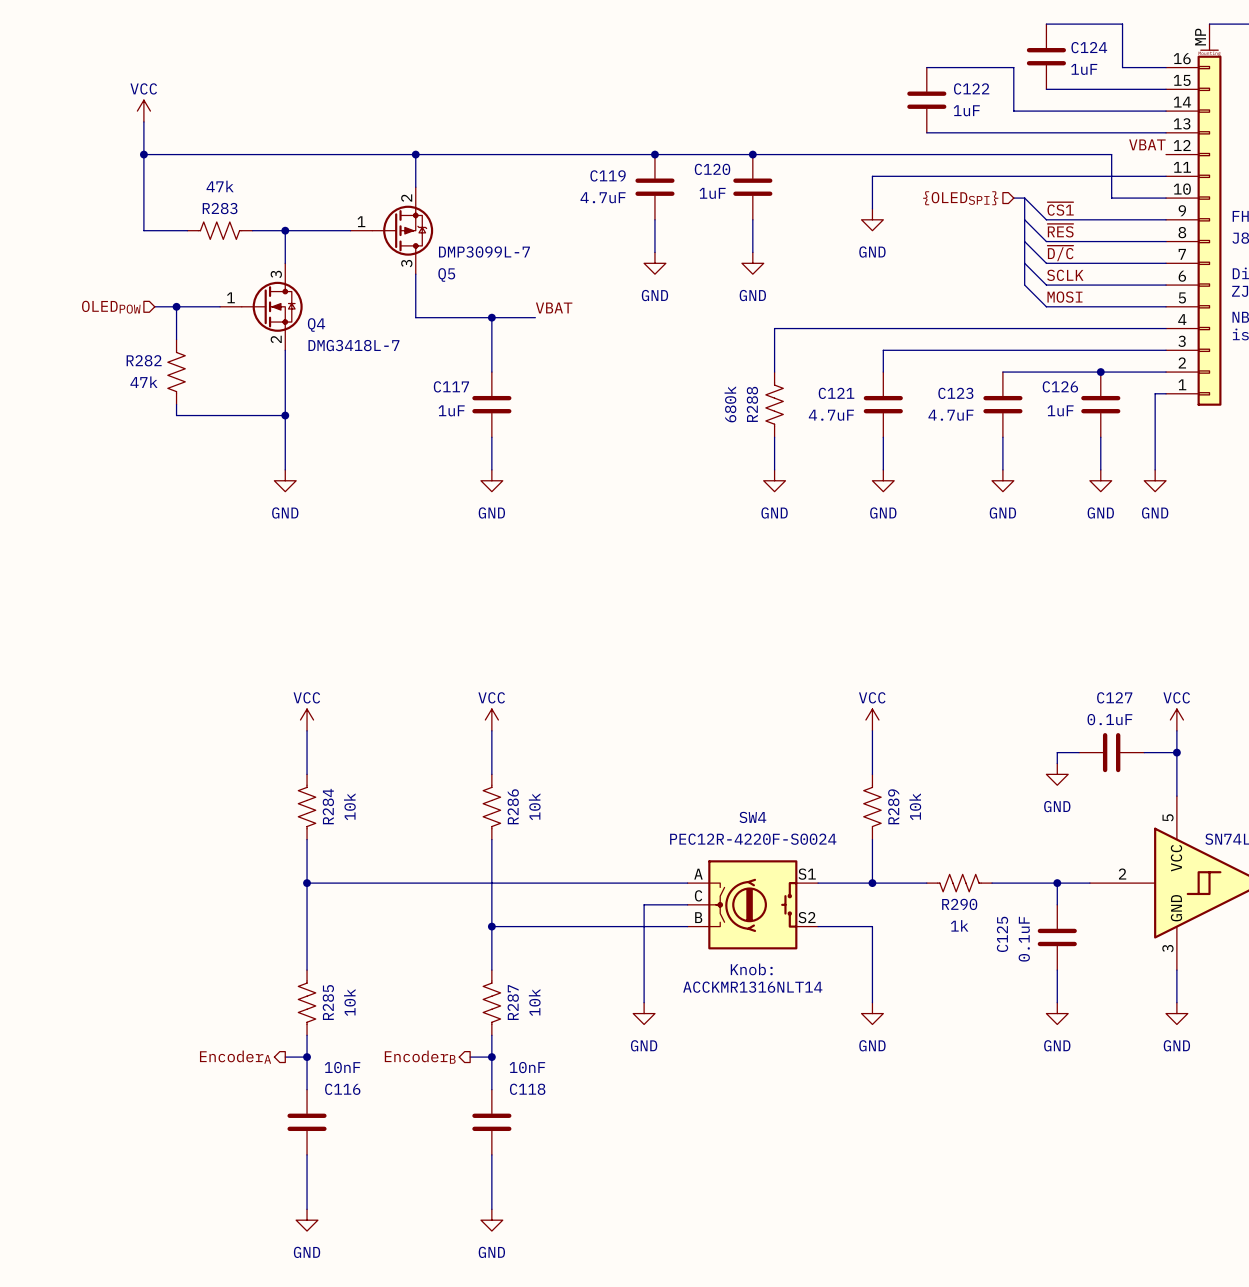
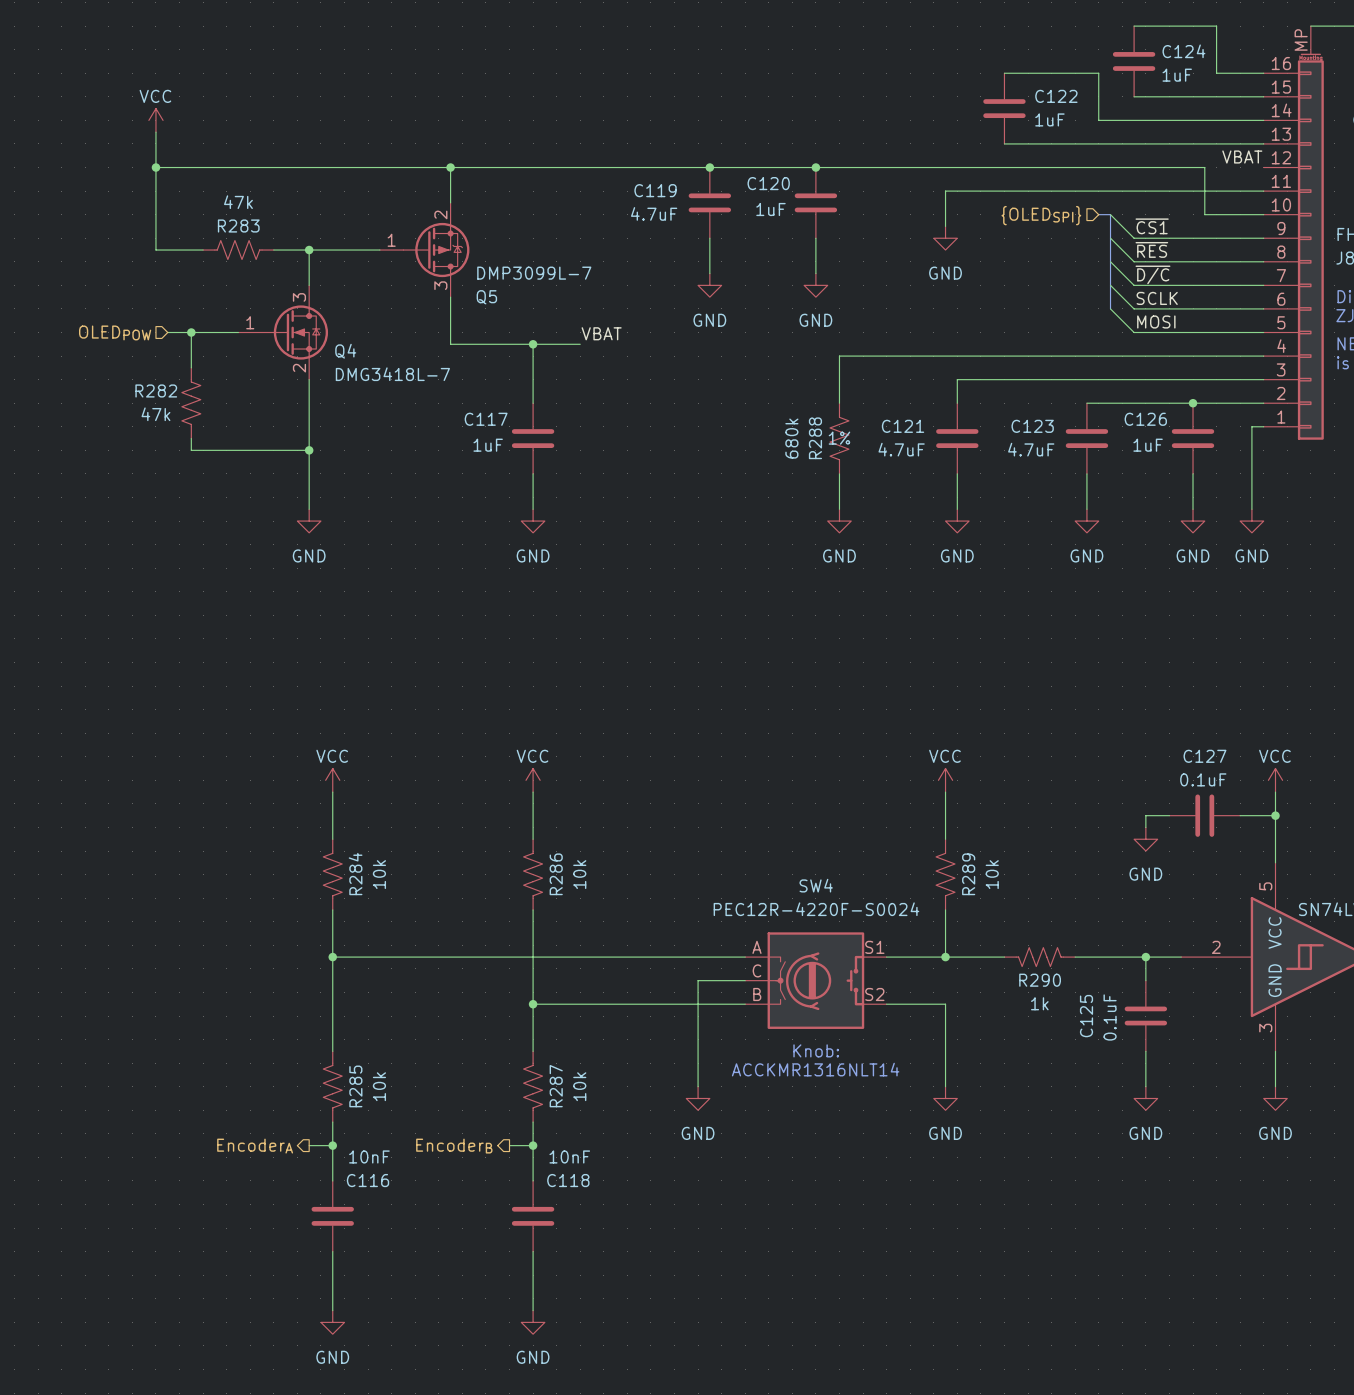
R288 text: none -> 1% (839, 438)

